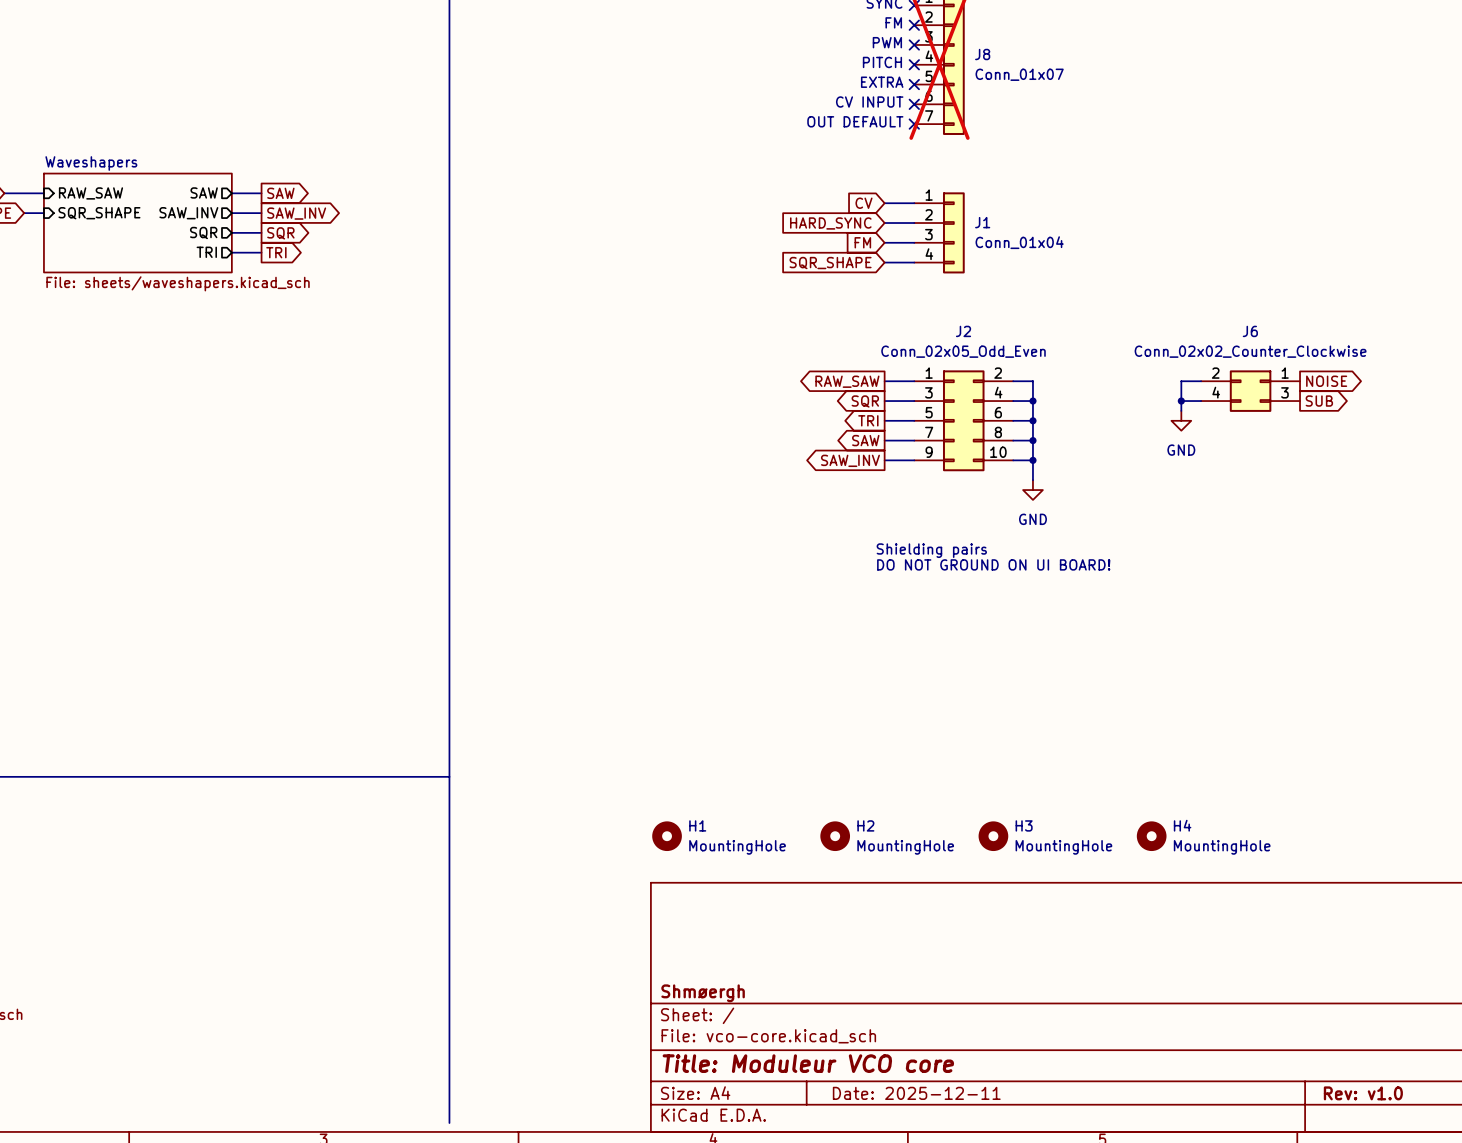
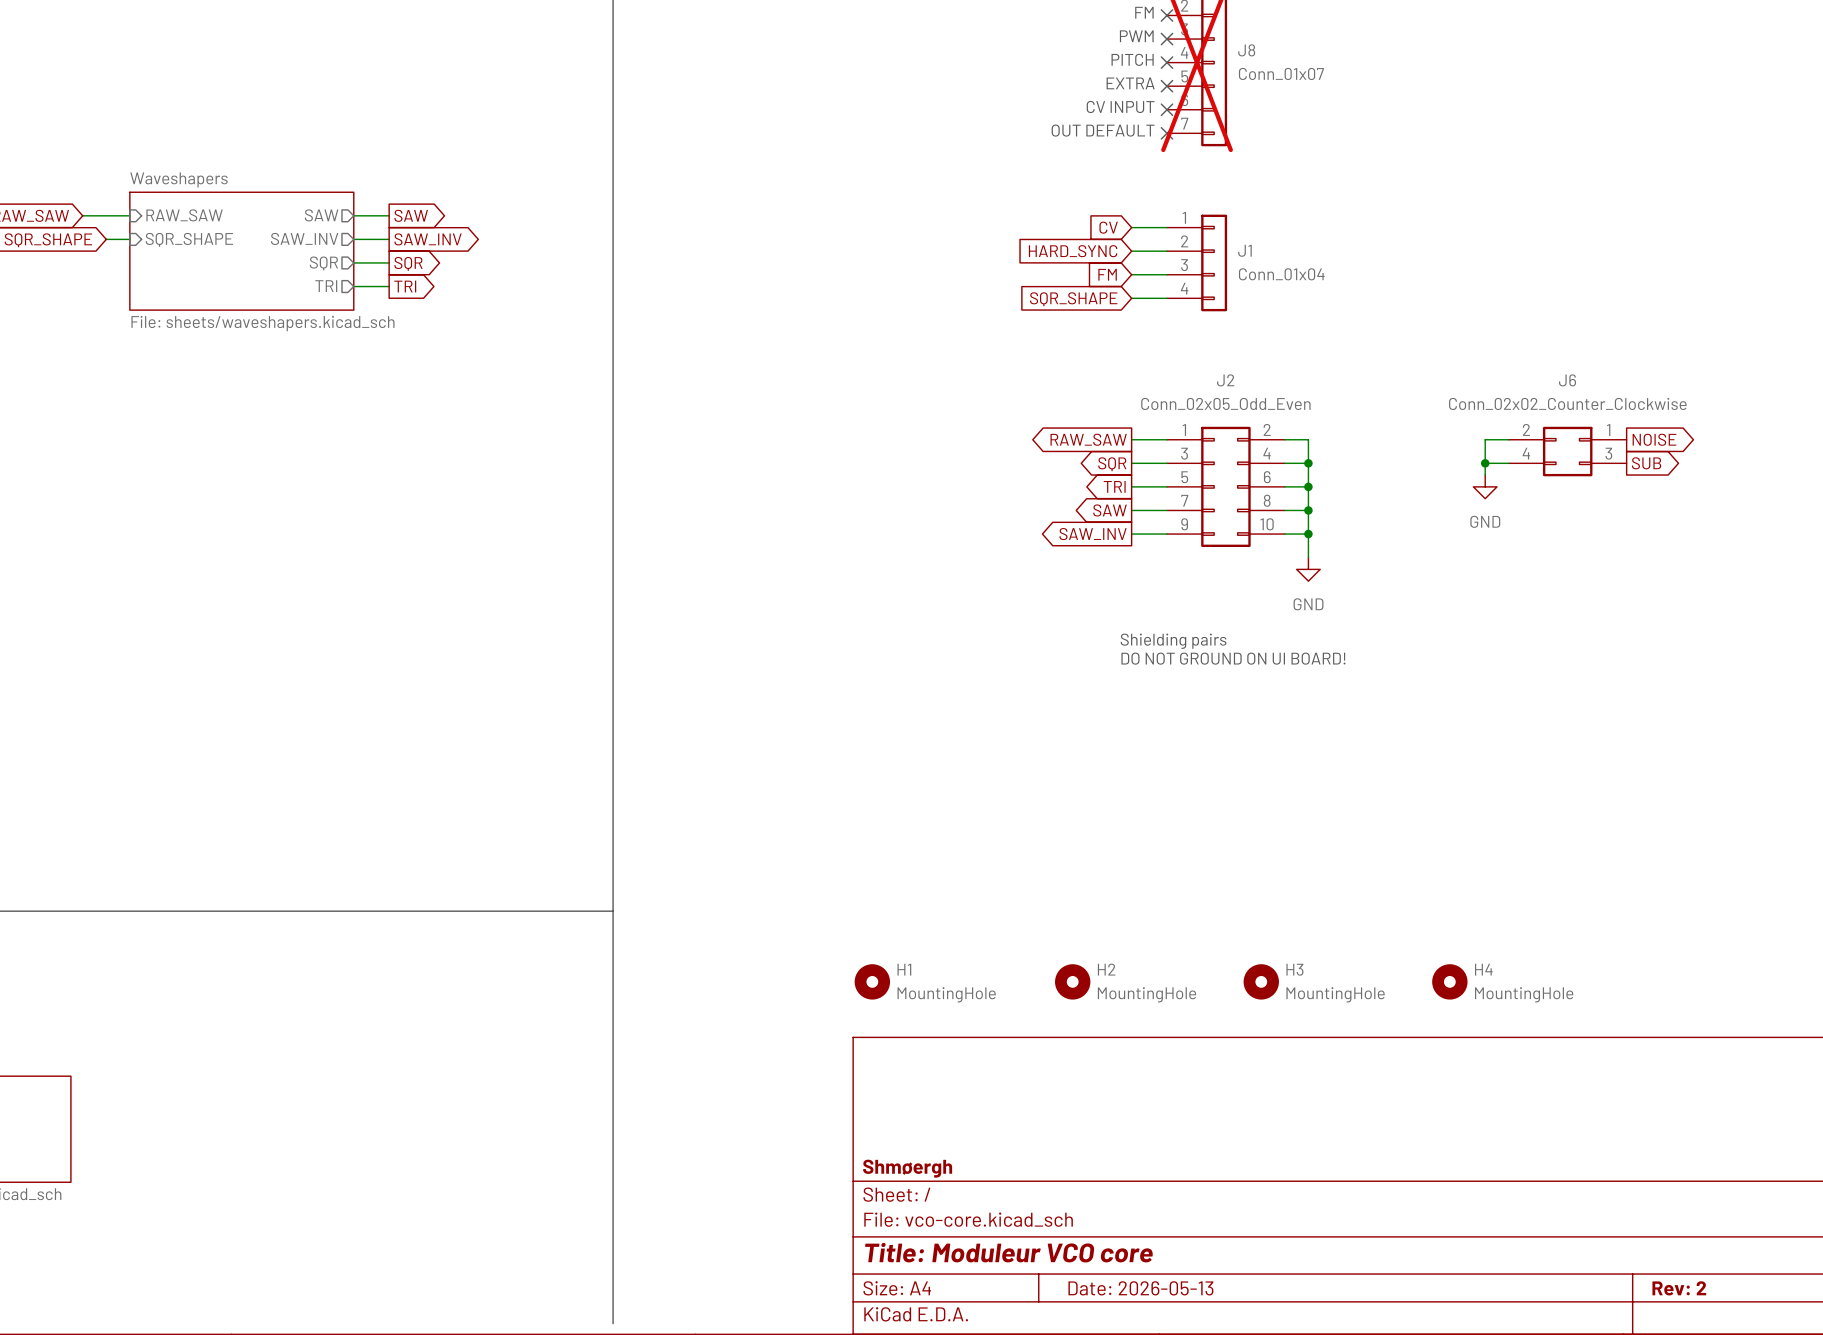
title block: Date: 2025-12-11 (916, 1093) -> Date: 2026-05-13 (1140, 1288)
title block: Rev: v1.0 (1363, 1093) -> Rev: 2 (1679, 1288)

